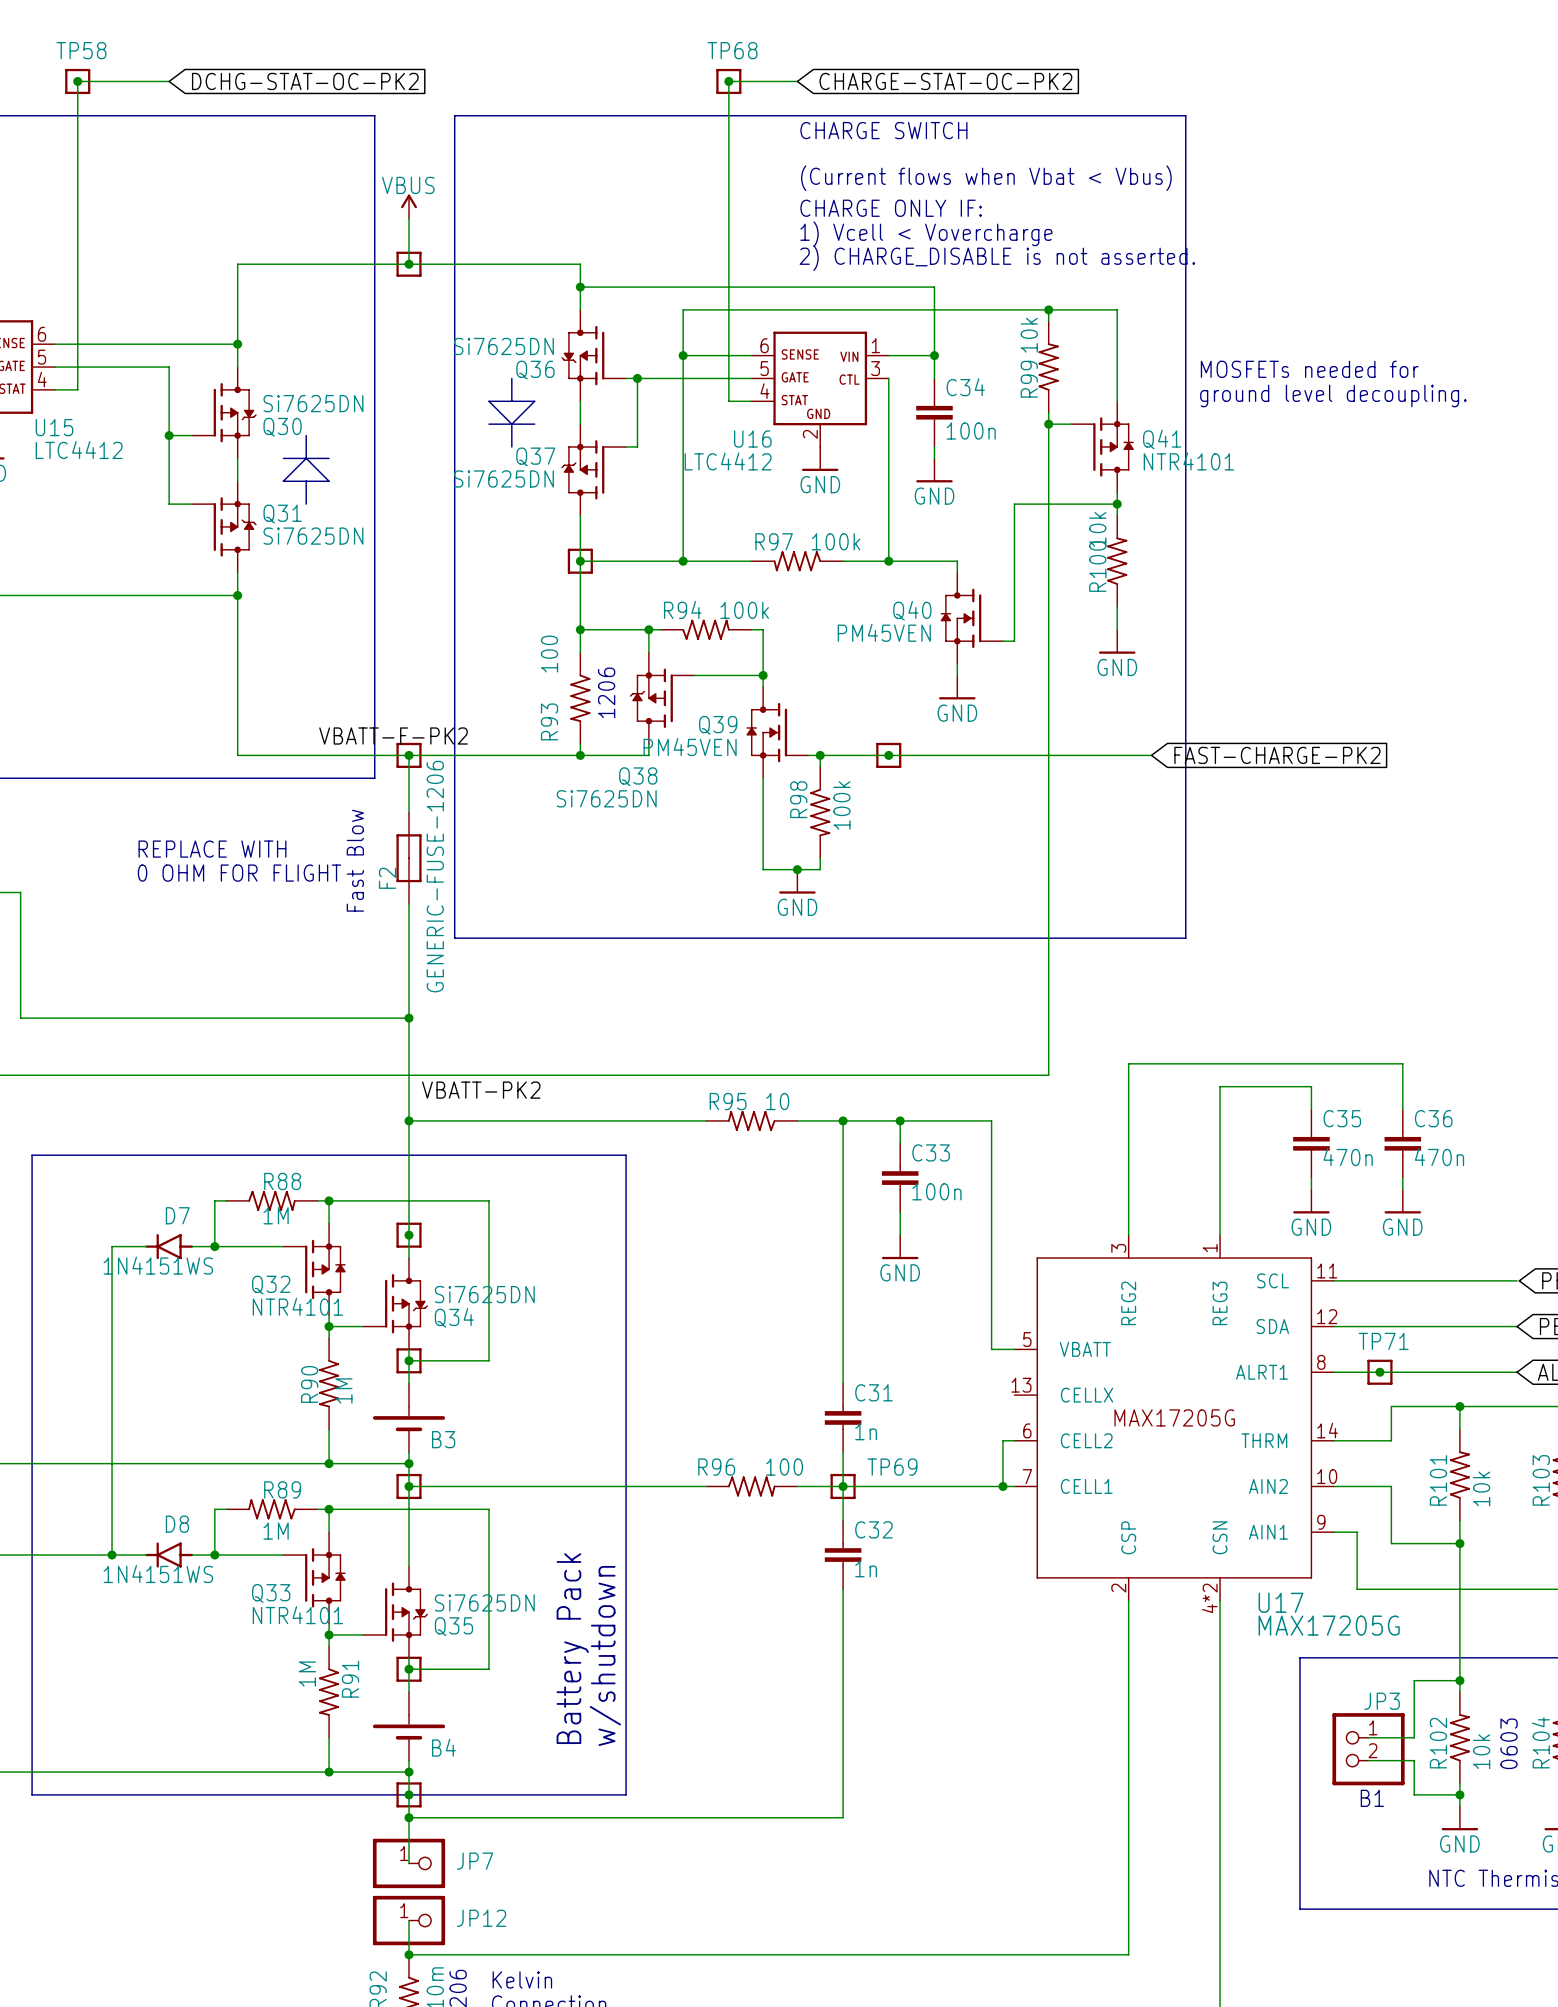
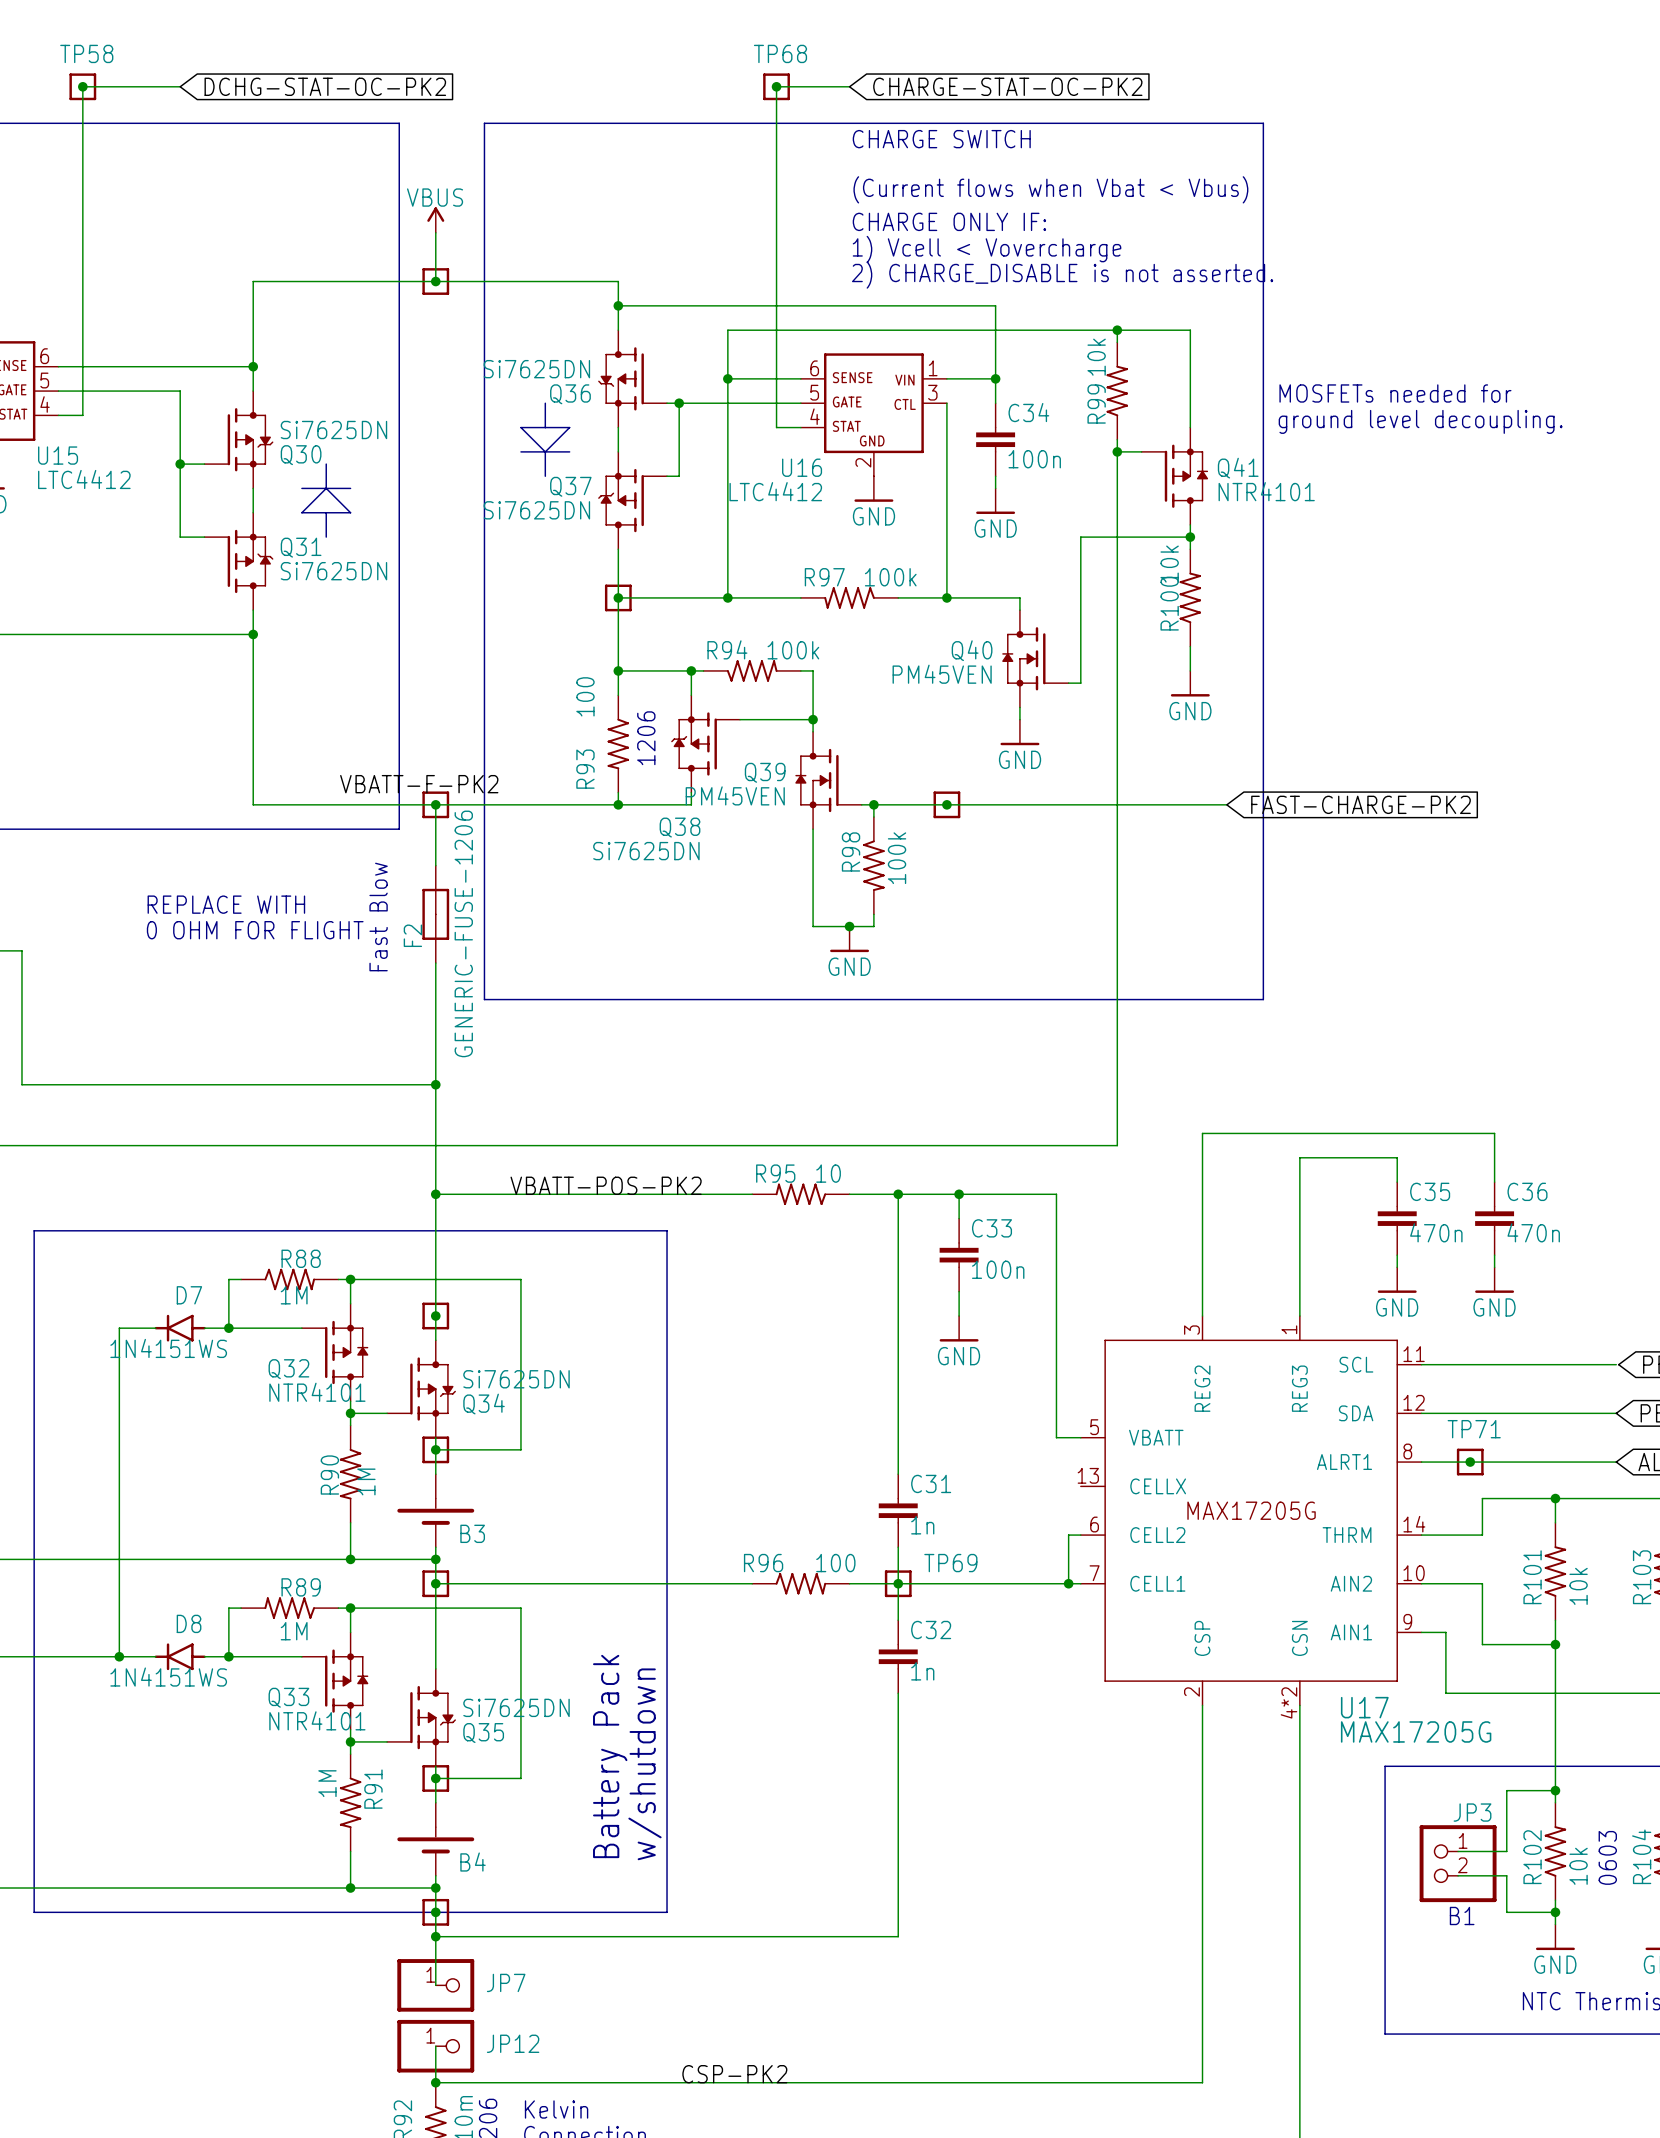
label: VBATT-PK2 (481, 1090) -> VBATT-POS-PK2 (606, 1185)
label: none -> CSP-PK2 (734, 2074)

